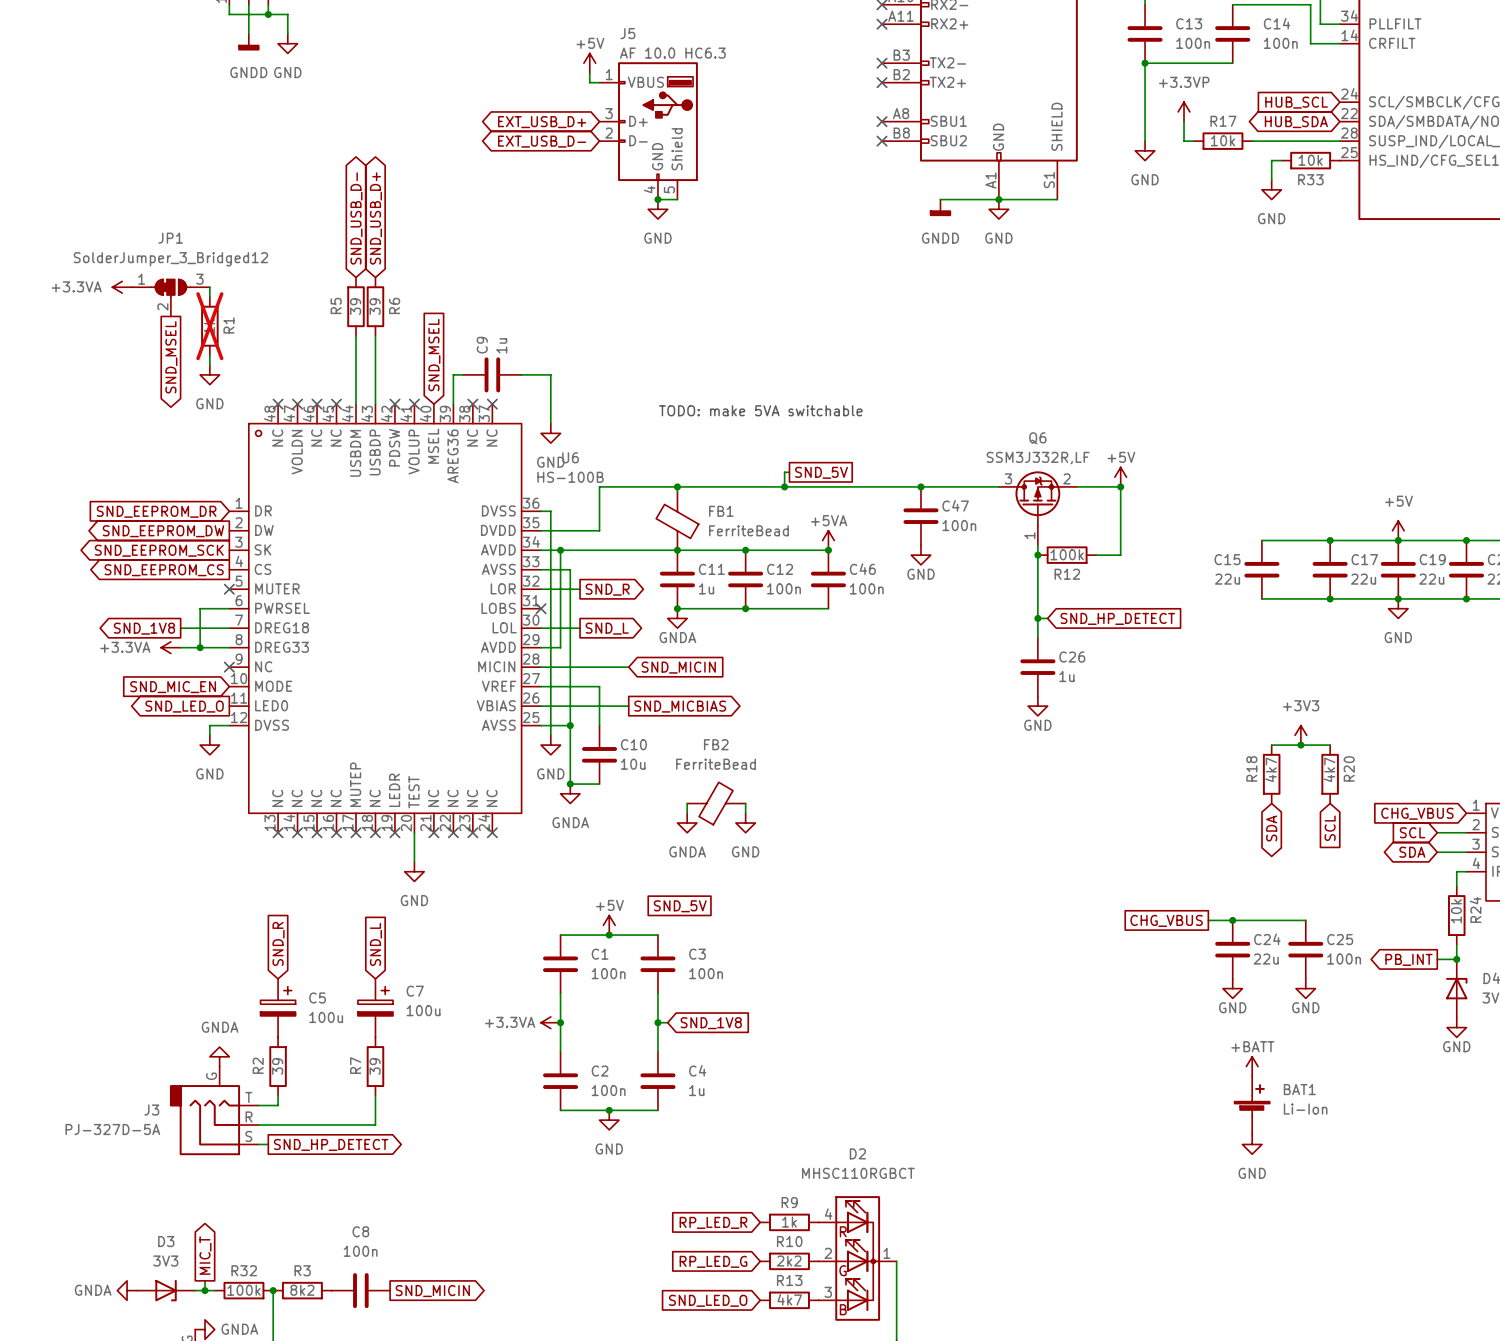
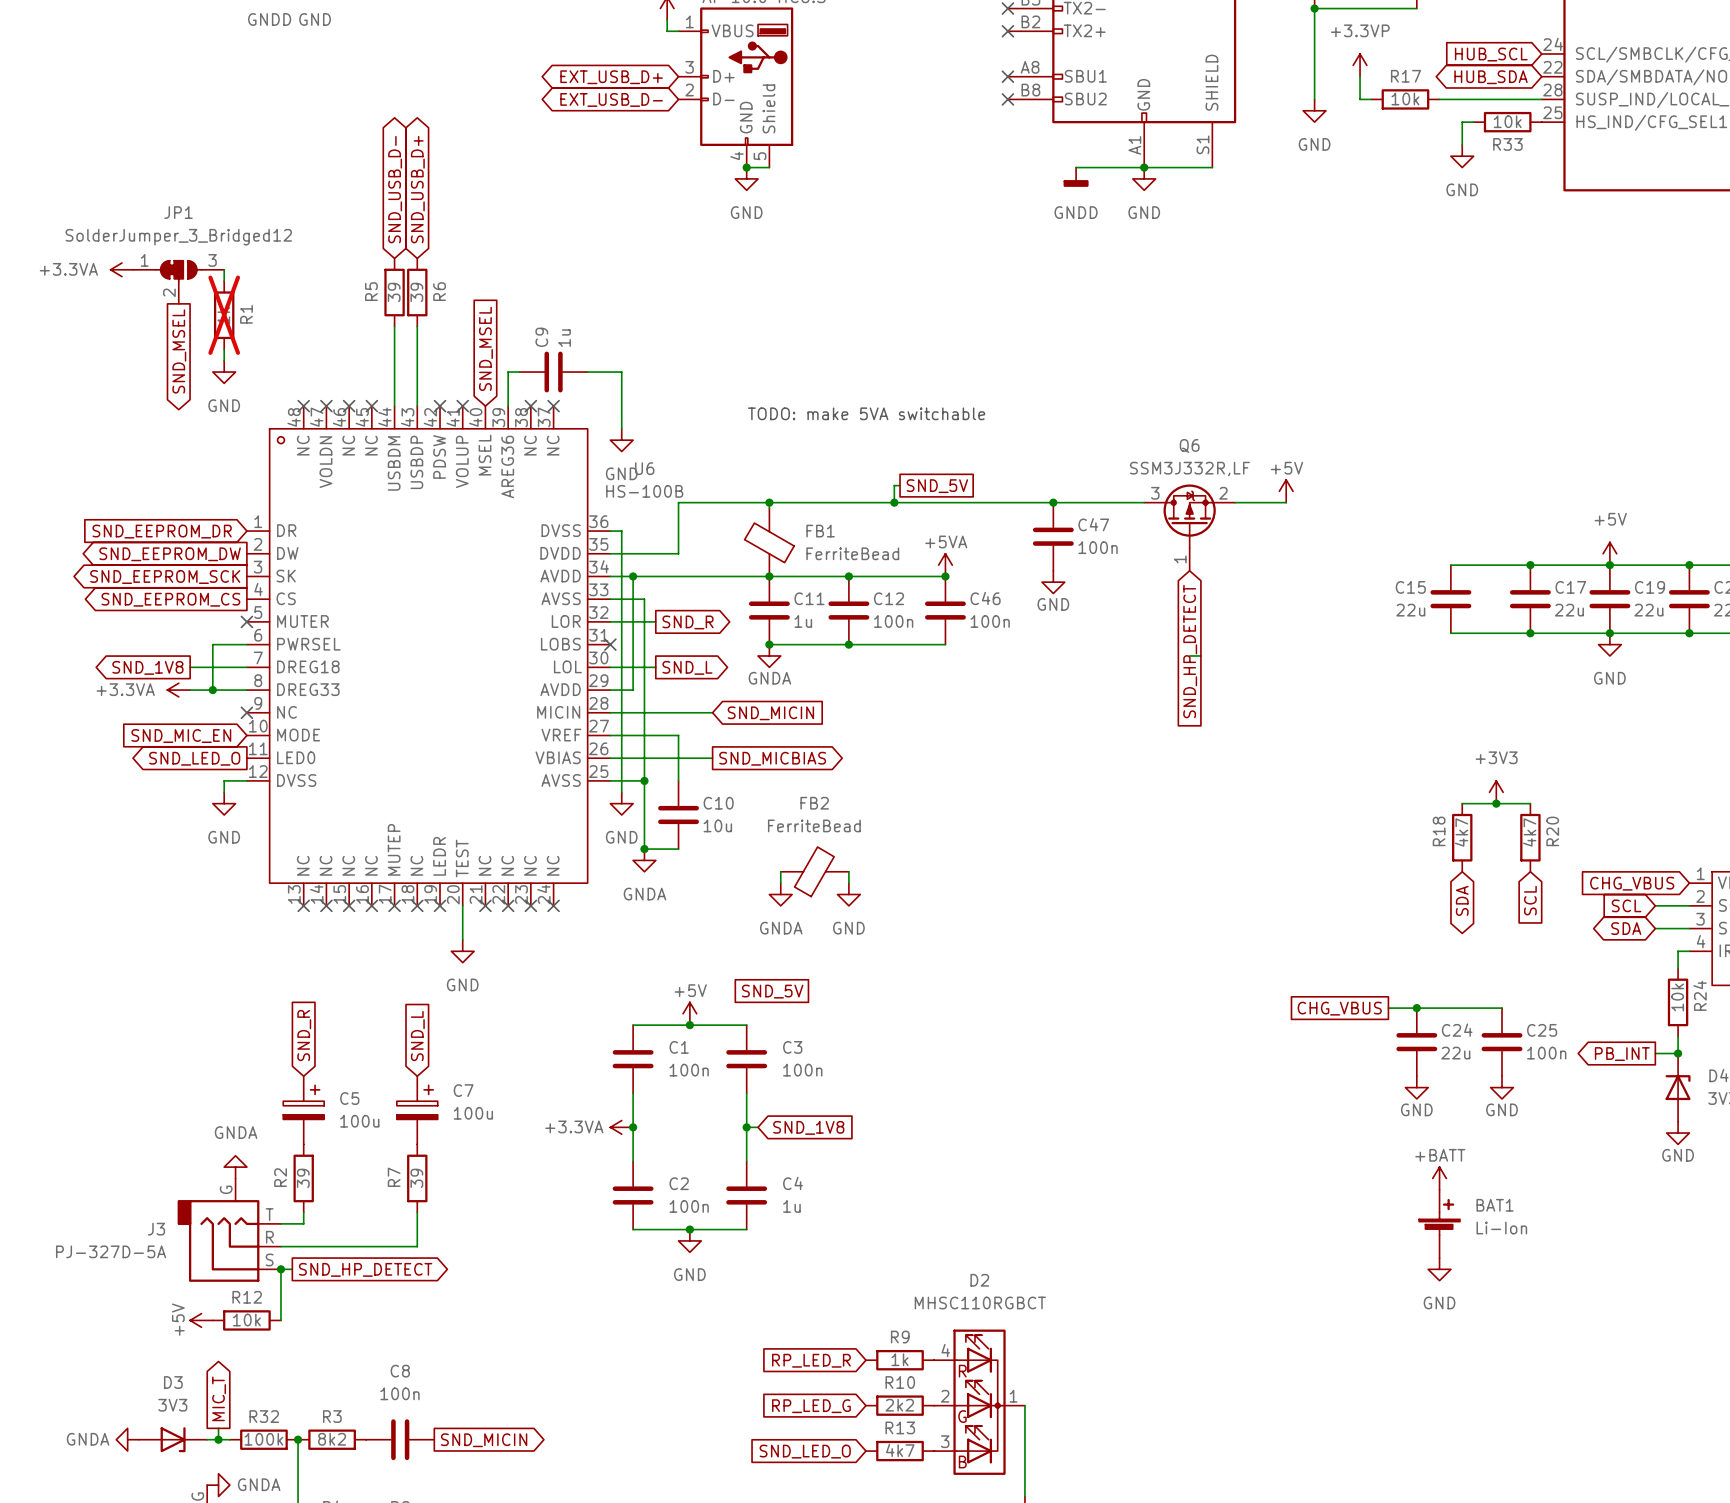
wire: (1120, 486) (1120, 555) (1096, 555) -> none
junction: (1120, 486) -> none
wire: (1037, 545) (1037, 637) -> none
R12 value: 100k (1067, 554) -> 10k (246, 1320)
junction: (1037, 555) -> none
R12 position: (1067, 555) -> (246, 1320)
R12 name position: R12 (1067, 574) -> R12 (247, 1297)
junction: (1037, 618) -> none
global label rotation: 0° (1117, 618) -> 90° clockwise (1190, 651)
C26: 1u (1037, 667) -> none
power symbol: GND (1037, 706) -> none
wire: none -> (280, 1269) (280, 1320)
junction: none -> (280, 1269)
power symbol: none -> +5V (201, 1320)

